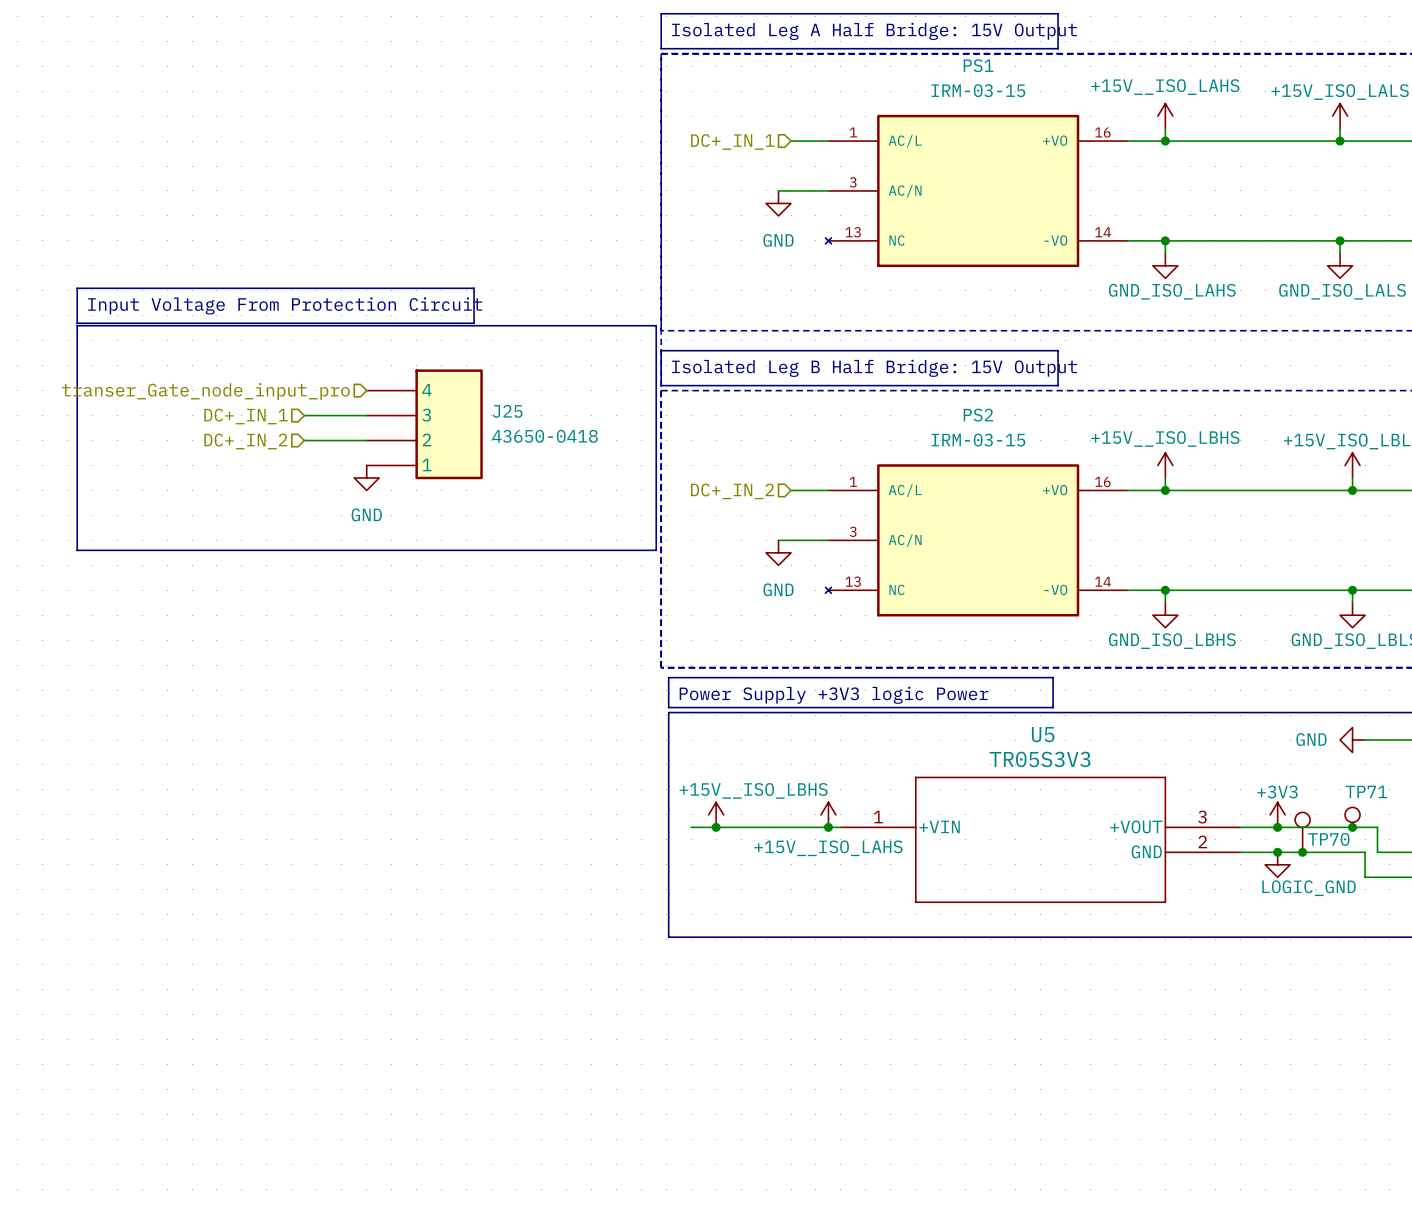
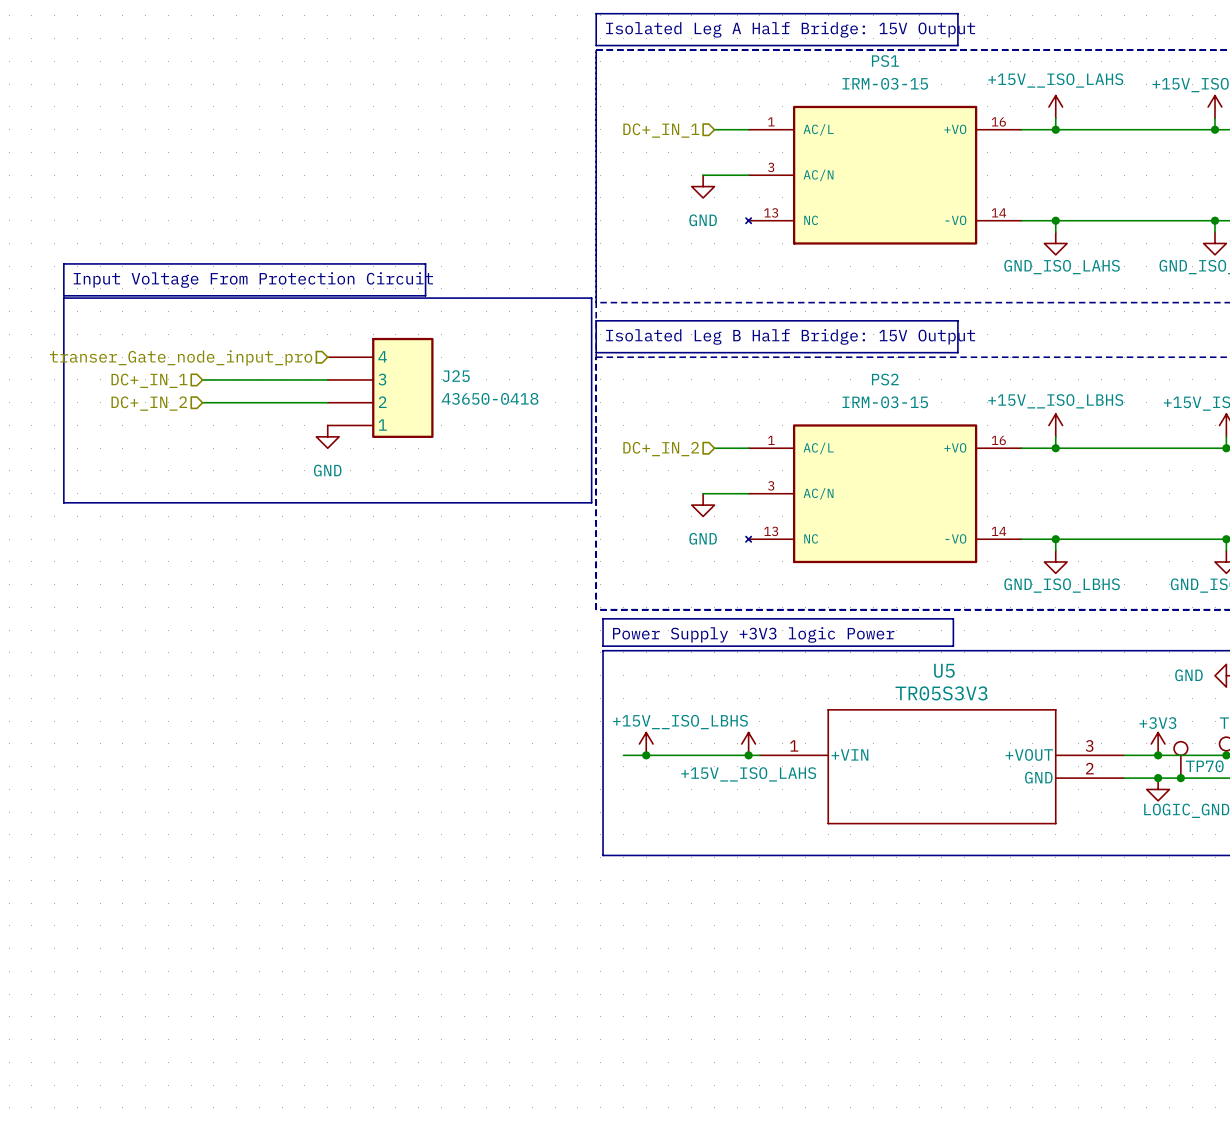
wire: none -> (202, 379) (270, 379)
hierarchical label position: DC+_IN_1 (246, 416) -> DC+_IN_1 (149, 380)
wire: none -> (202, 402) (270, 402)
hierarchical label position: DC+_IN_2 (245, 441) -> DC+_IN_2 (149, 403)

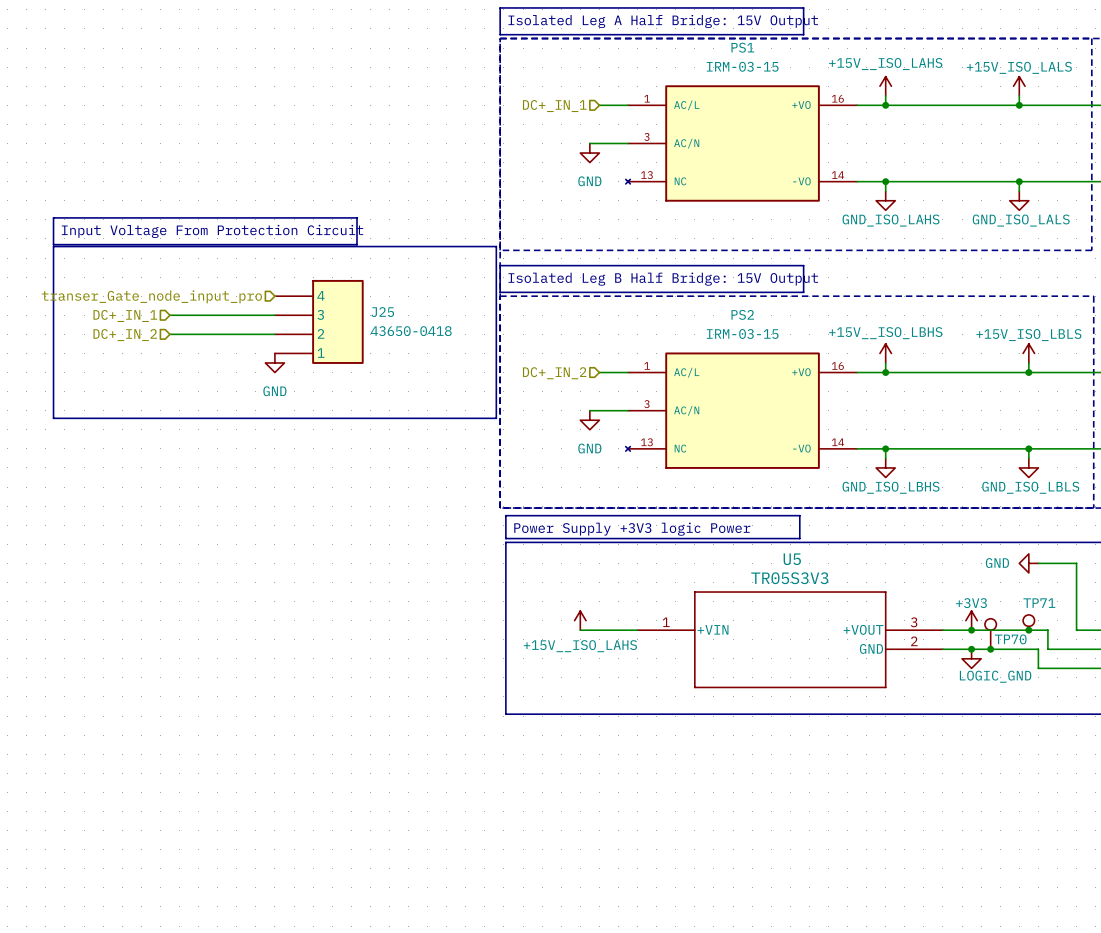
power symbol: +15V__ISO_LBHS (646, 743) -> none
power symbol position: +15V__ISO_LAHS (748, 743) -> +15V__ISO_LAHS (580, 620)
wire: (623, 755) (691, 755) -> none
junction: (646, 755) -> none
junction: (748, 755) -> none

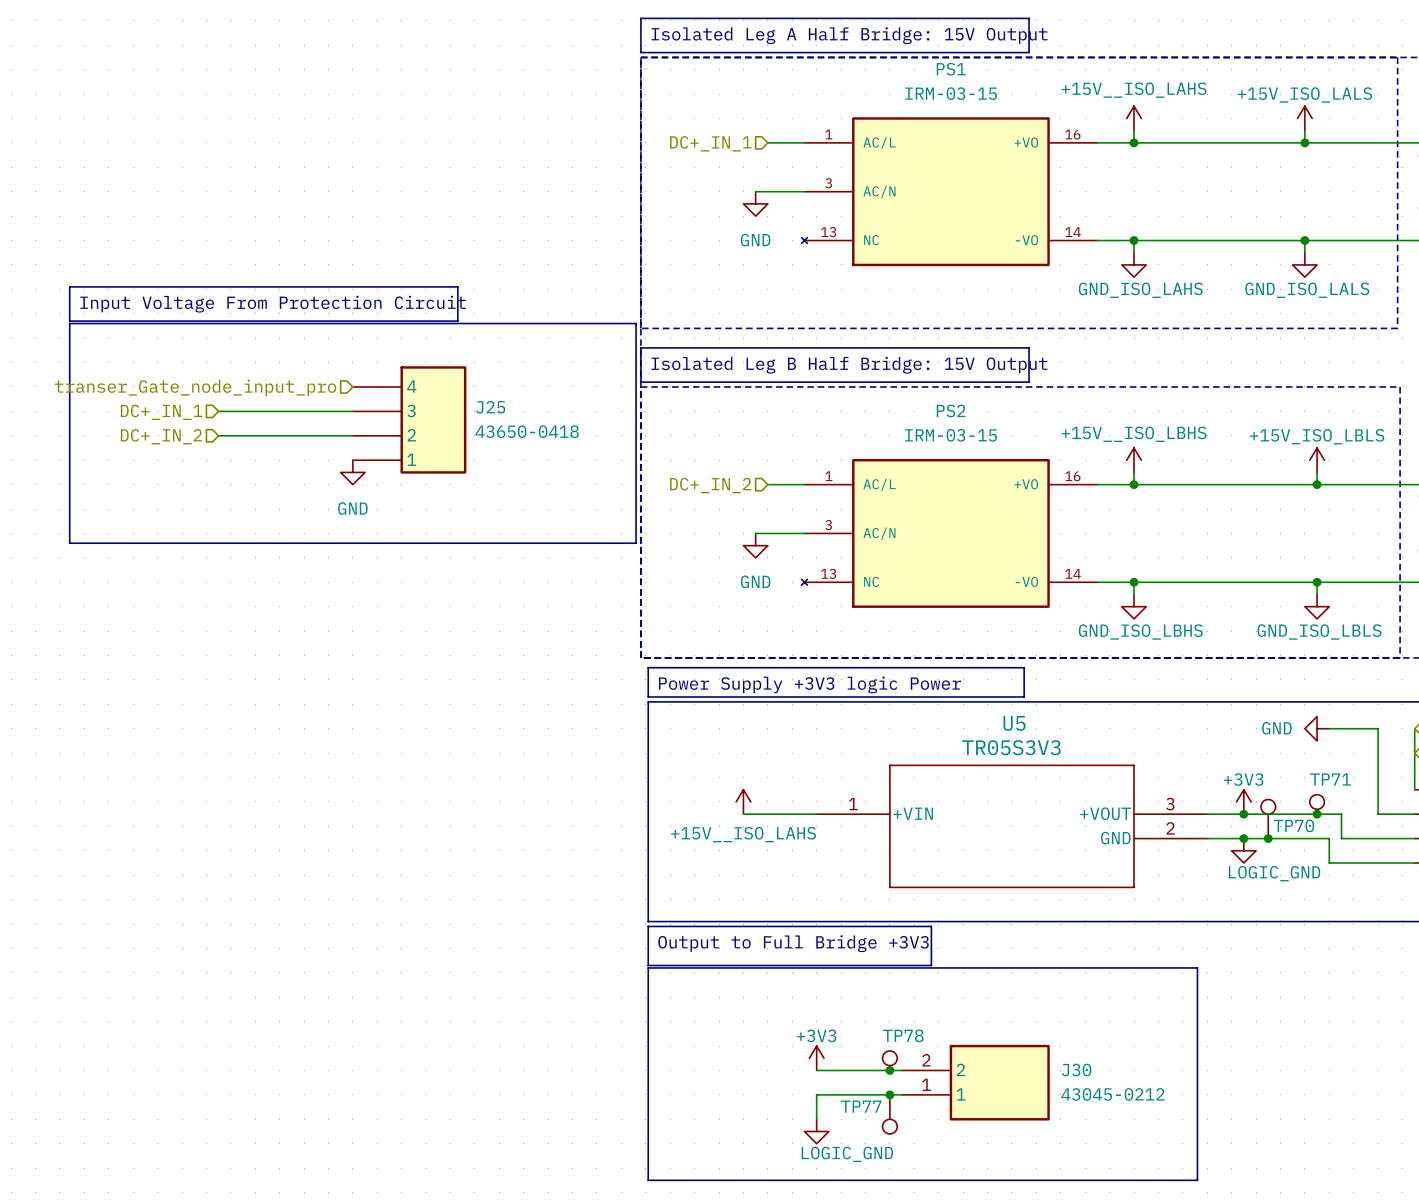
line: none -> (648, 926) (648, 965) (931, 965) (931, 926) (648, 926)
text: none -> Output to Full Bridge +3V3 (793, 943)
line: none -> (648, 967) (1197, 967) (1197, 1180) (648, 1180) (648, 967)
power symbol: none -> +3V3 (816, 1058)
TP78: none -> (889, 1060)
wire: none -> (816, 1070) (902, 1070)
junction: none -> (889, 1070)
J30: none -> 43045-0212 (975, 1082)
junction: none -> (889, 1094)
wire: none -> (902, 1094) (816, 1094) (816, 1119)
TP77: none -> (889, 1114)
power symbol: none -> LOGIC_GND (816, 1131)

